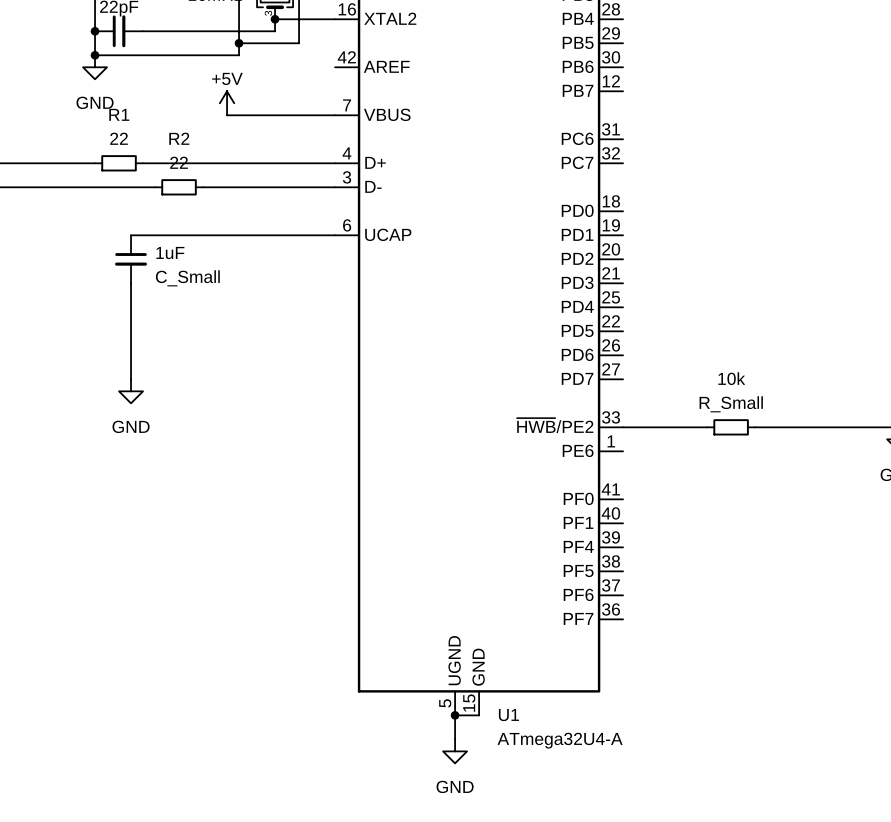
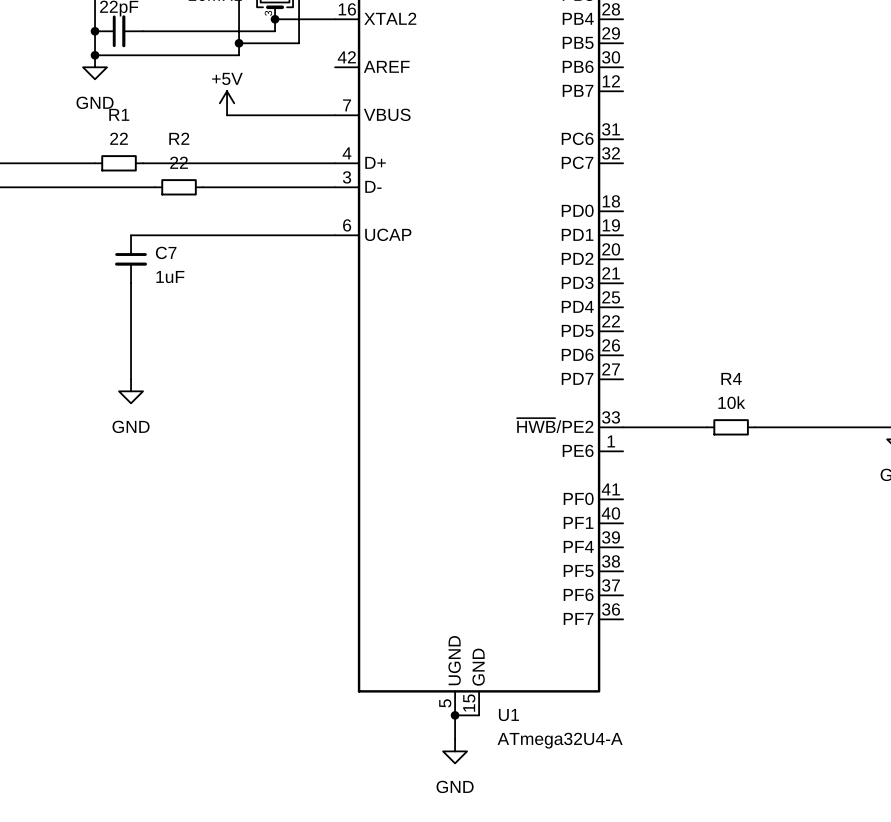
1uF name: 1uF (170, 253) -> C7 (166, 252)
1uF value: C_Small (187, 278) -> 1uF (170, 277)
10k name: 10k (731, 378) -> R4 (731, 378)
10k value: R_Small (731, 404) -> 10k (731, 402)

